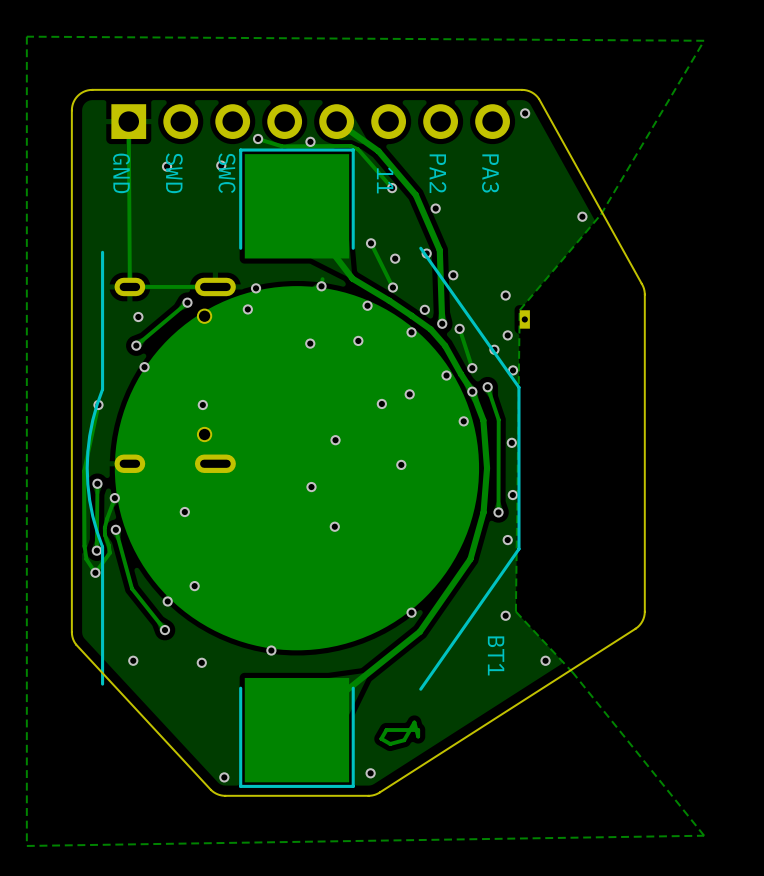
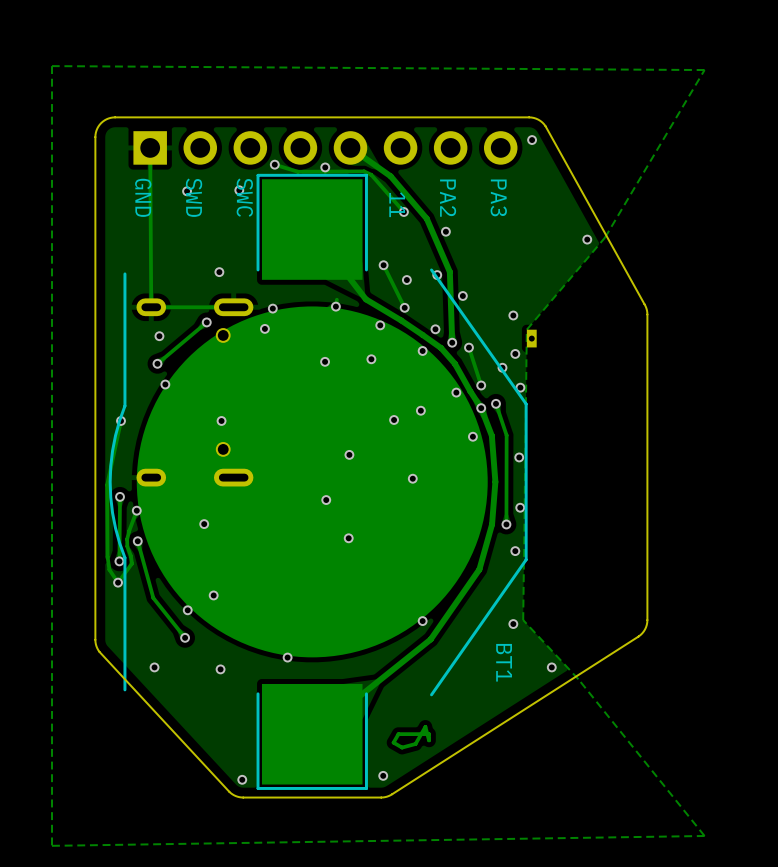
via: none -> (219, 272)

